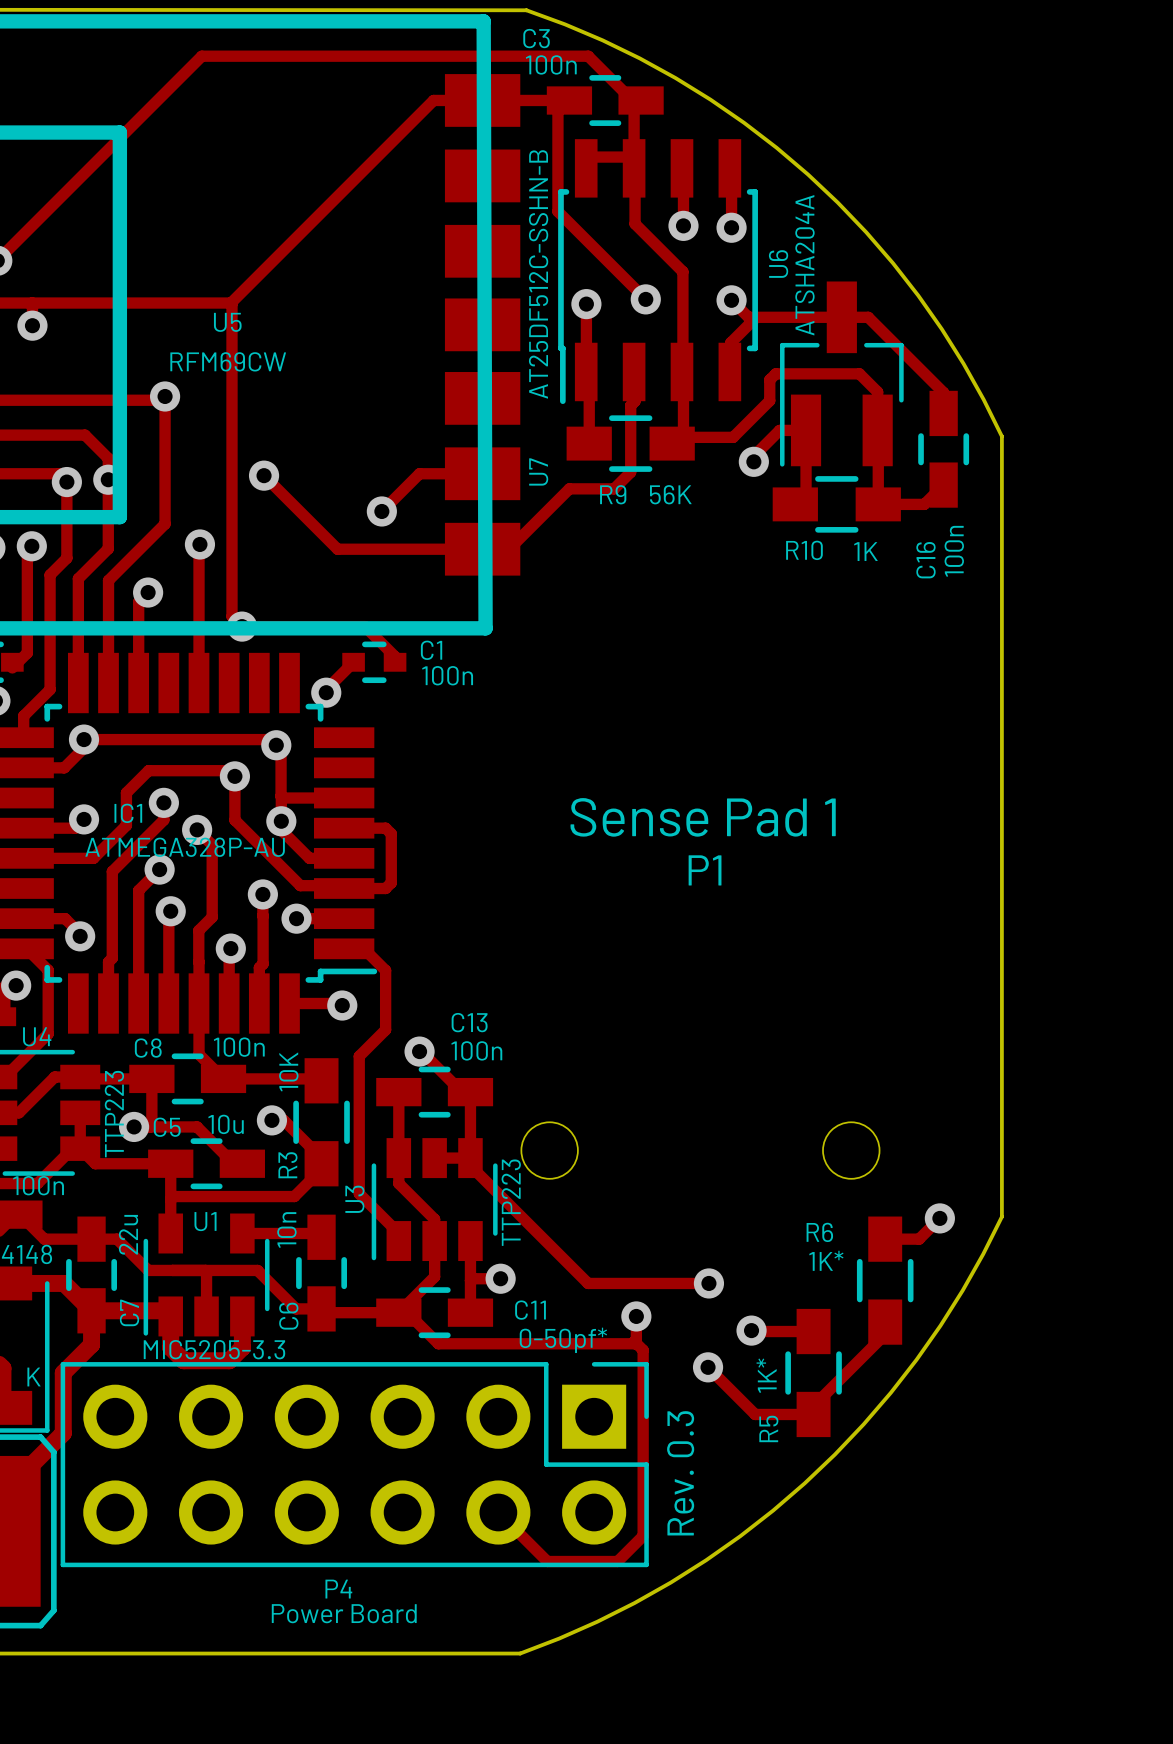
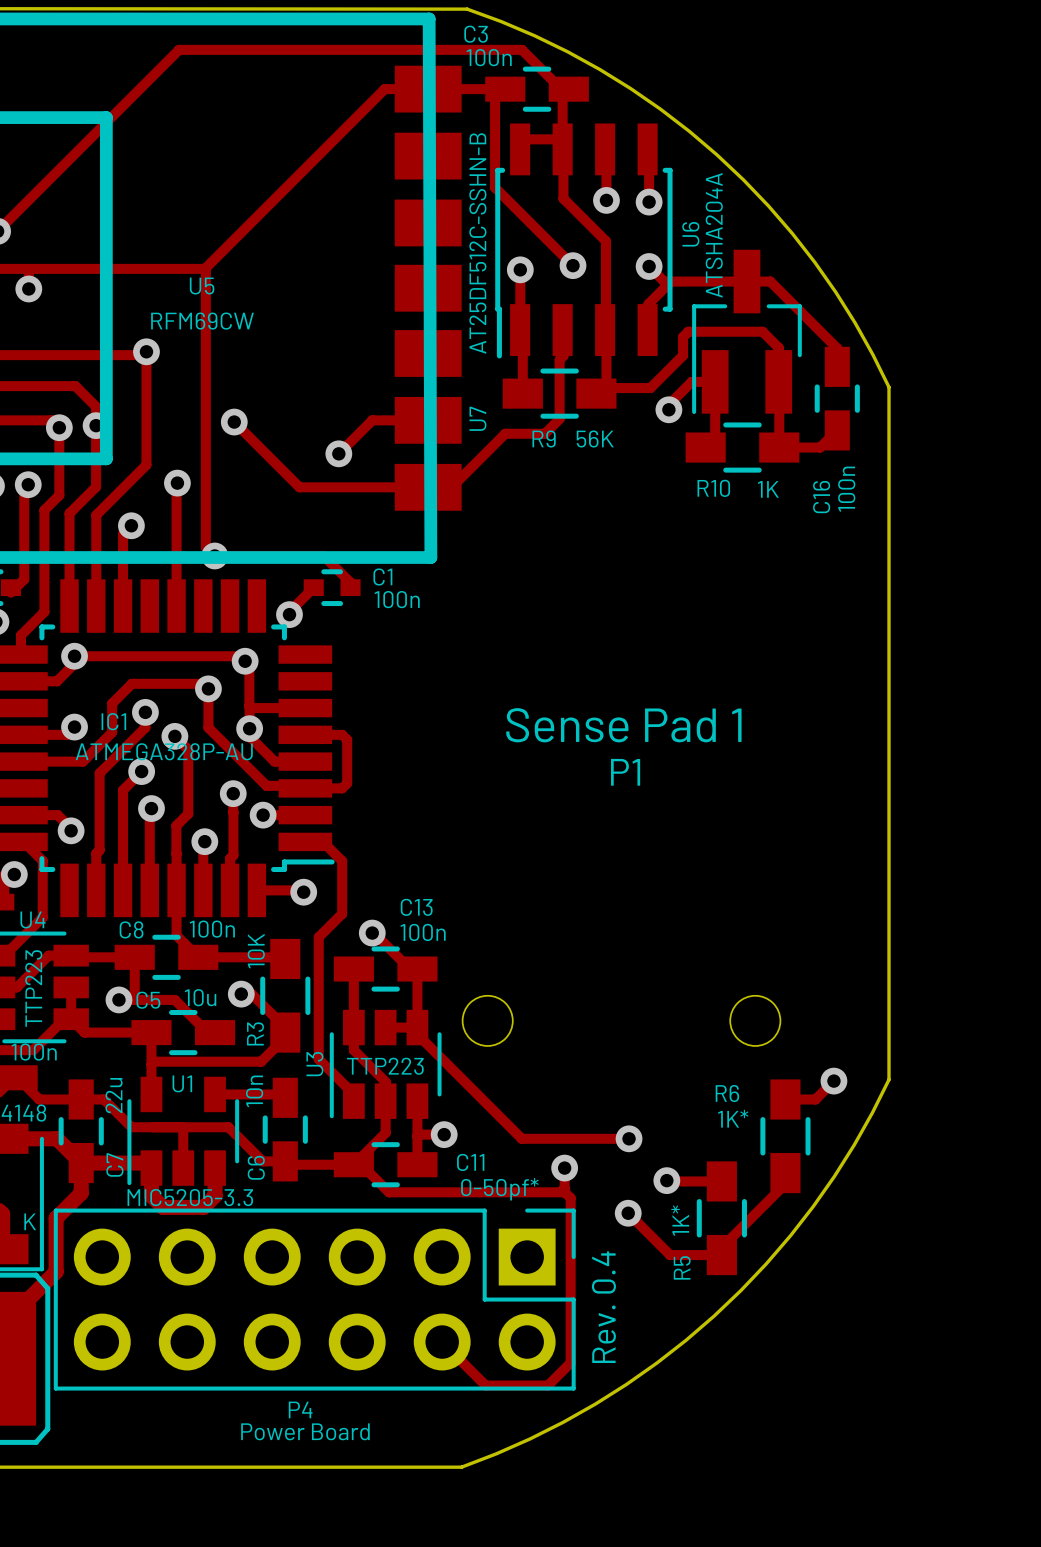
U4 value position: TTP223 (114, 1114) -> TTP223 (33, 988)
U3 value rotation: 0° (511, 1202) -> 90° clockwise (385, 1066)
text: Rev. 0.3 (680, 1473) -> Rev. 0.4 (603, 1307)

